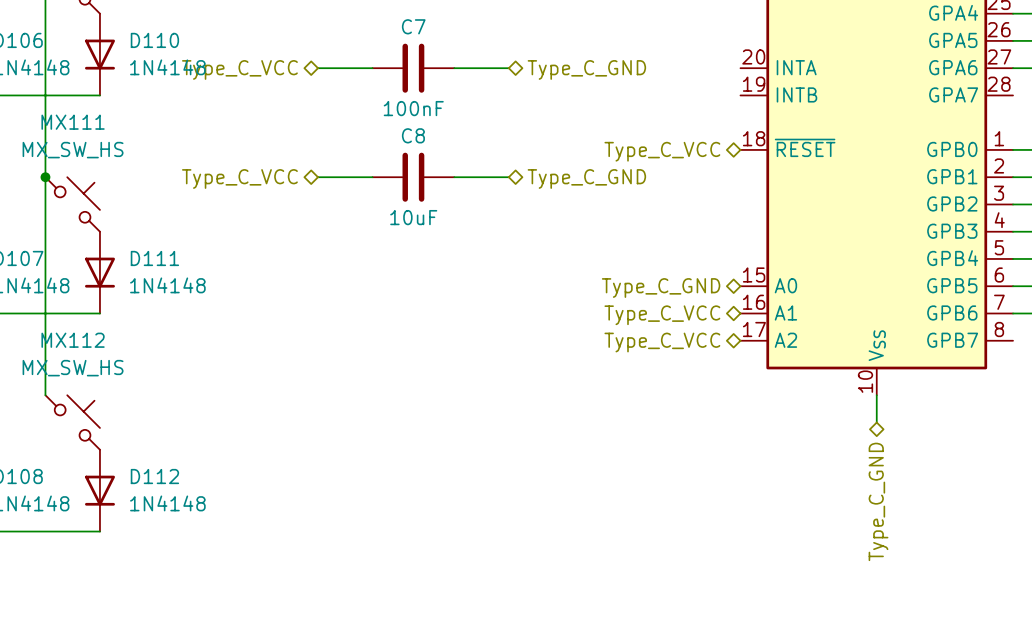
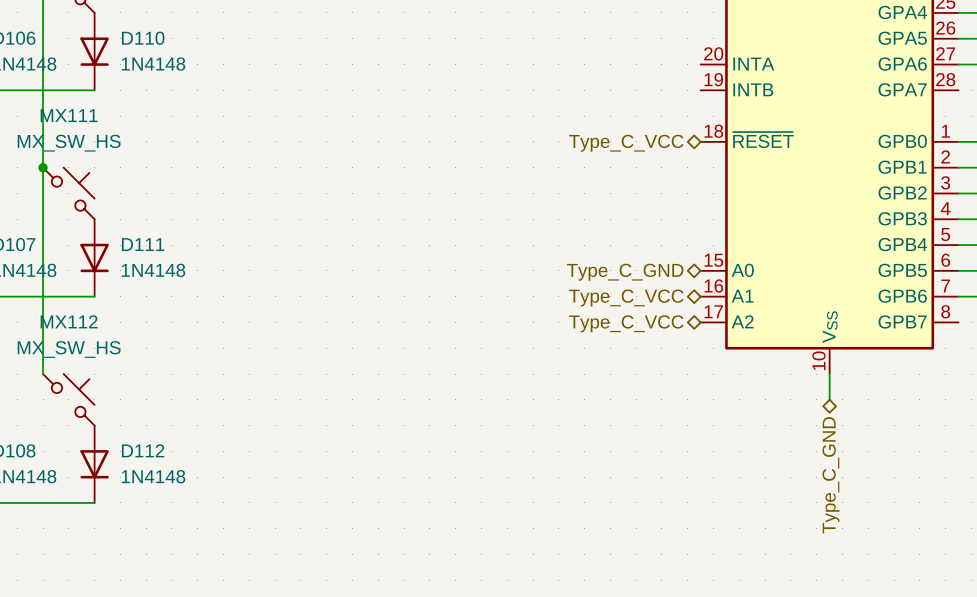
wire: (318, 68) (372, 68) -> none
C7: 100nF (413, 68) -> none
wire: (454, 68) (508, 68) -> none
hierarchical label: Type_C_VCC (239, 69) -> none
hierarchical label: Type_C_GND (586, 69) -> none
wire: (318, 177) (372, 177) -> none
C8: 10uF (413, 177) -> none
wire: (454, 177) (508, 177) -> none
hierarchical label: Type_C_VCC (239, 178) -> none
hierarchical label: Type_C_GND (586, 178) -> none

